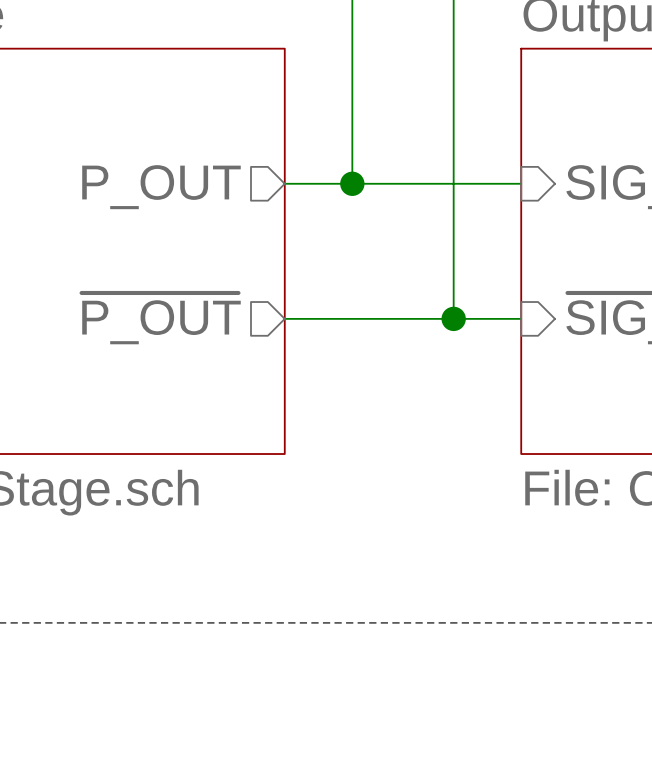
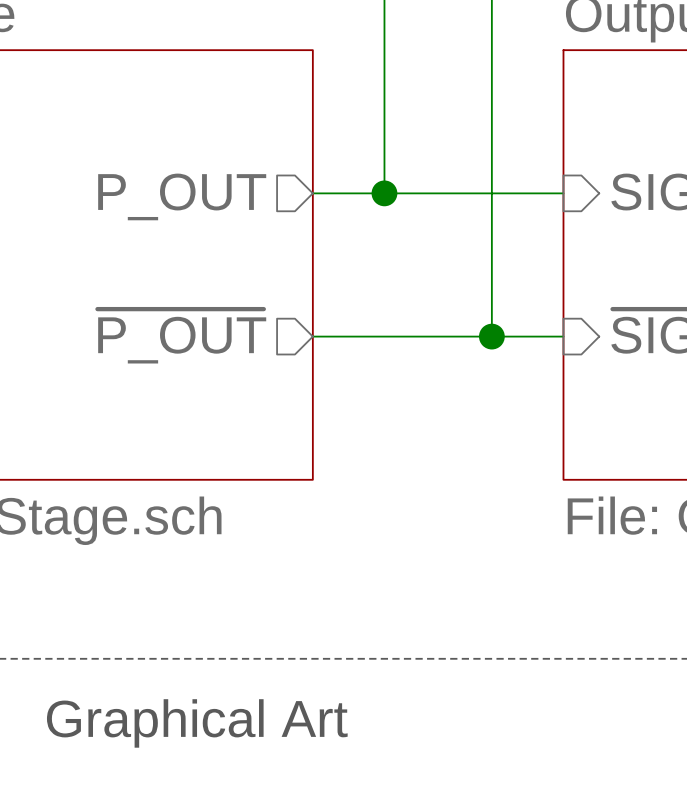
text: none -> Graphical Art (197, 723)

